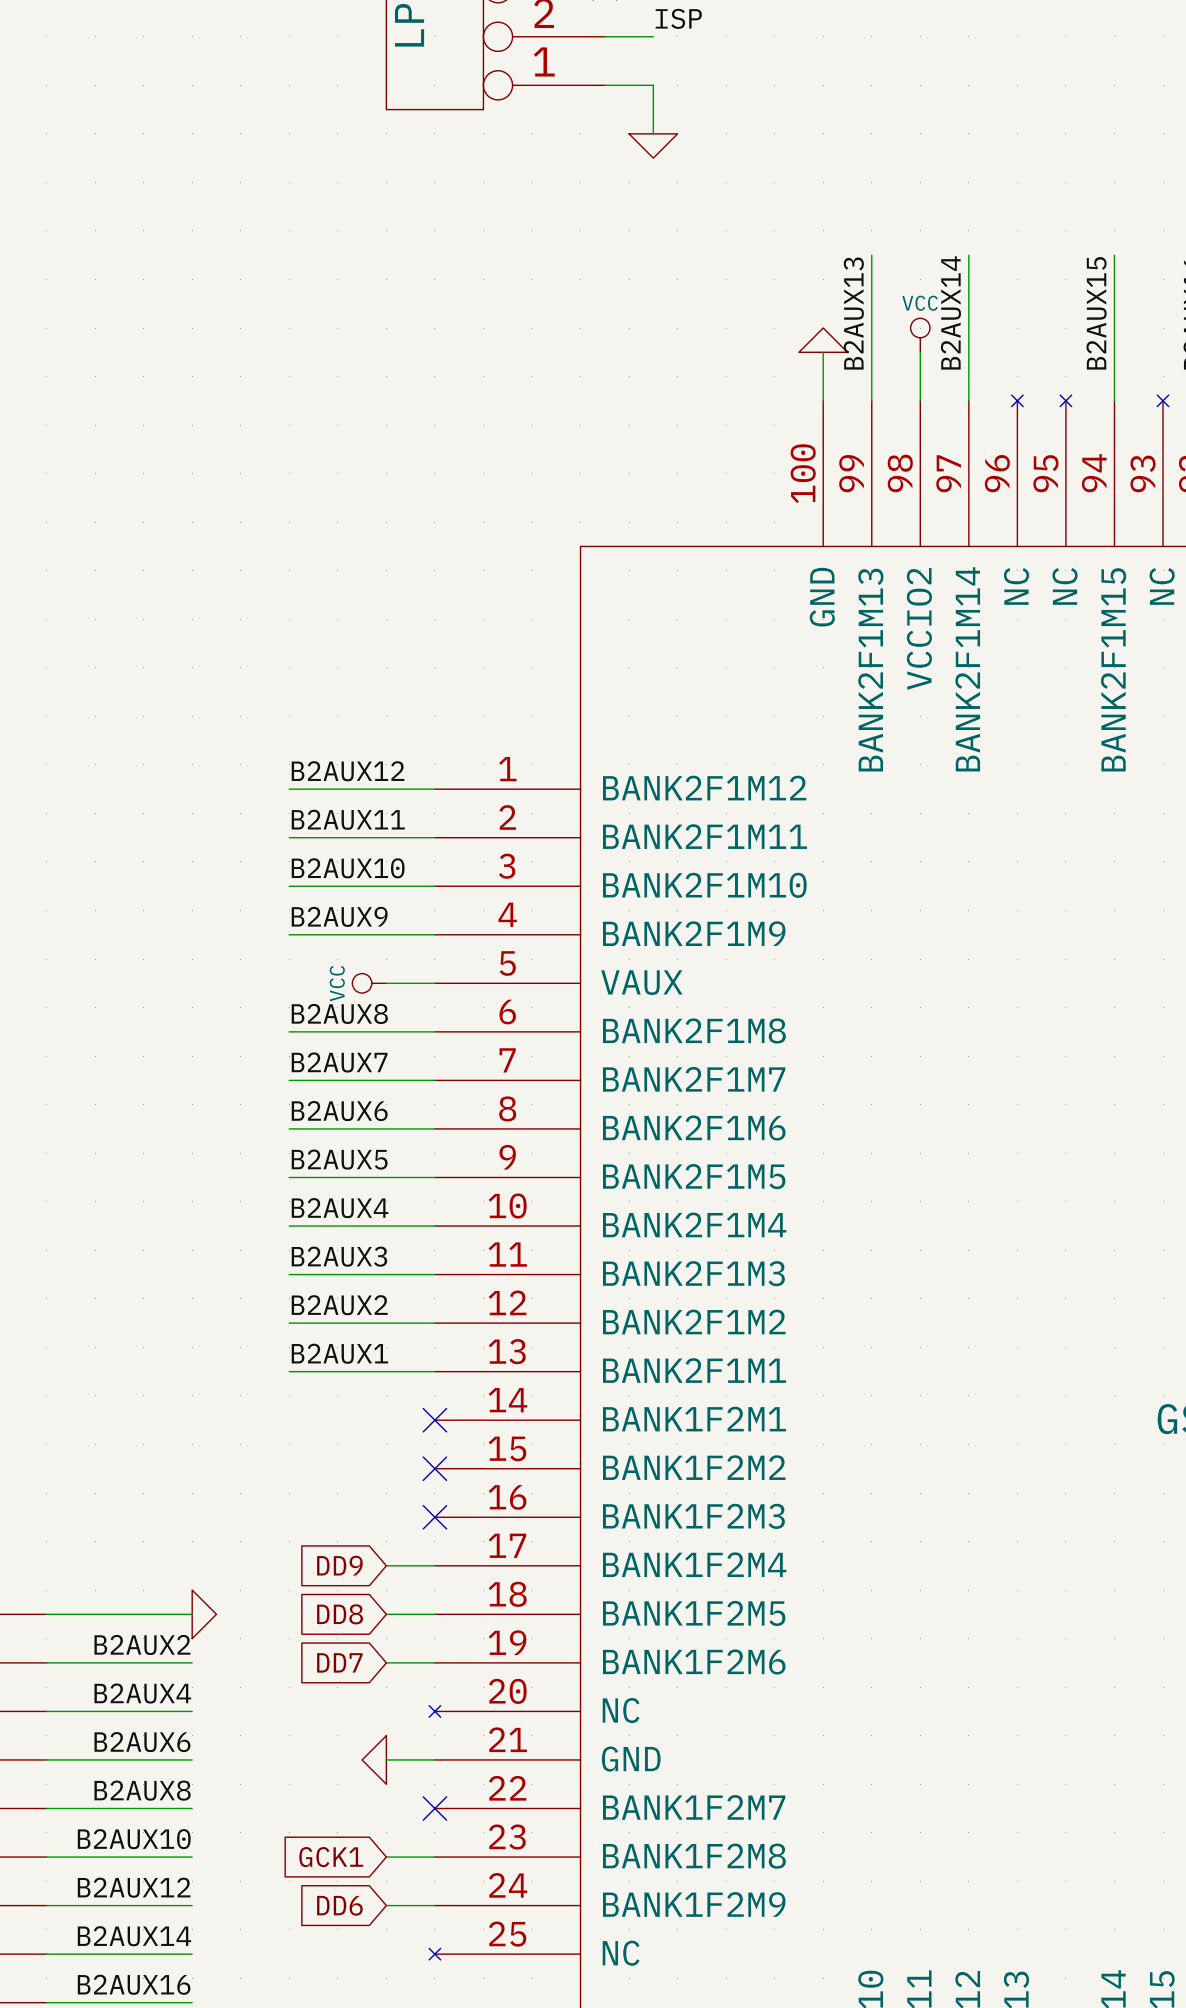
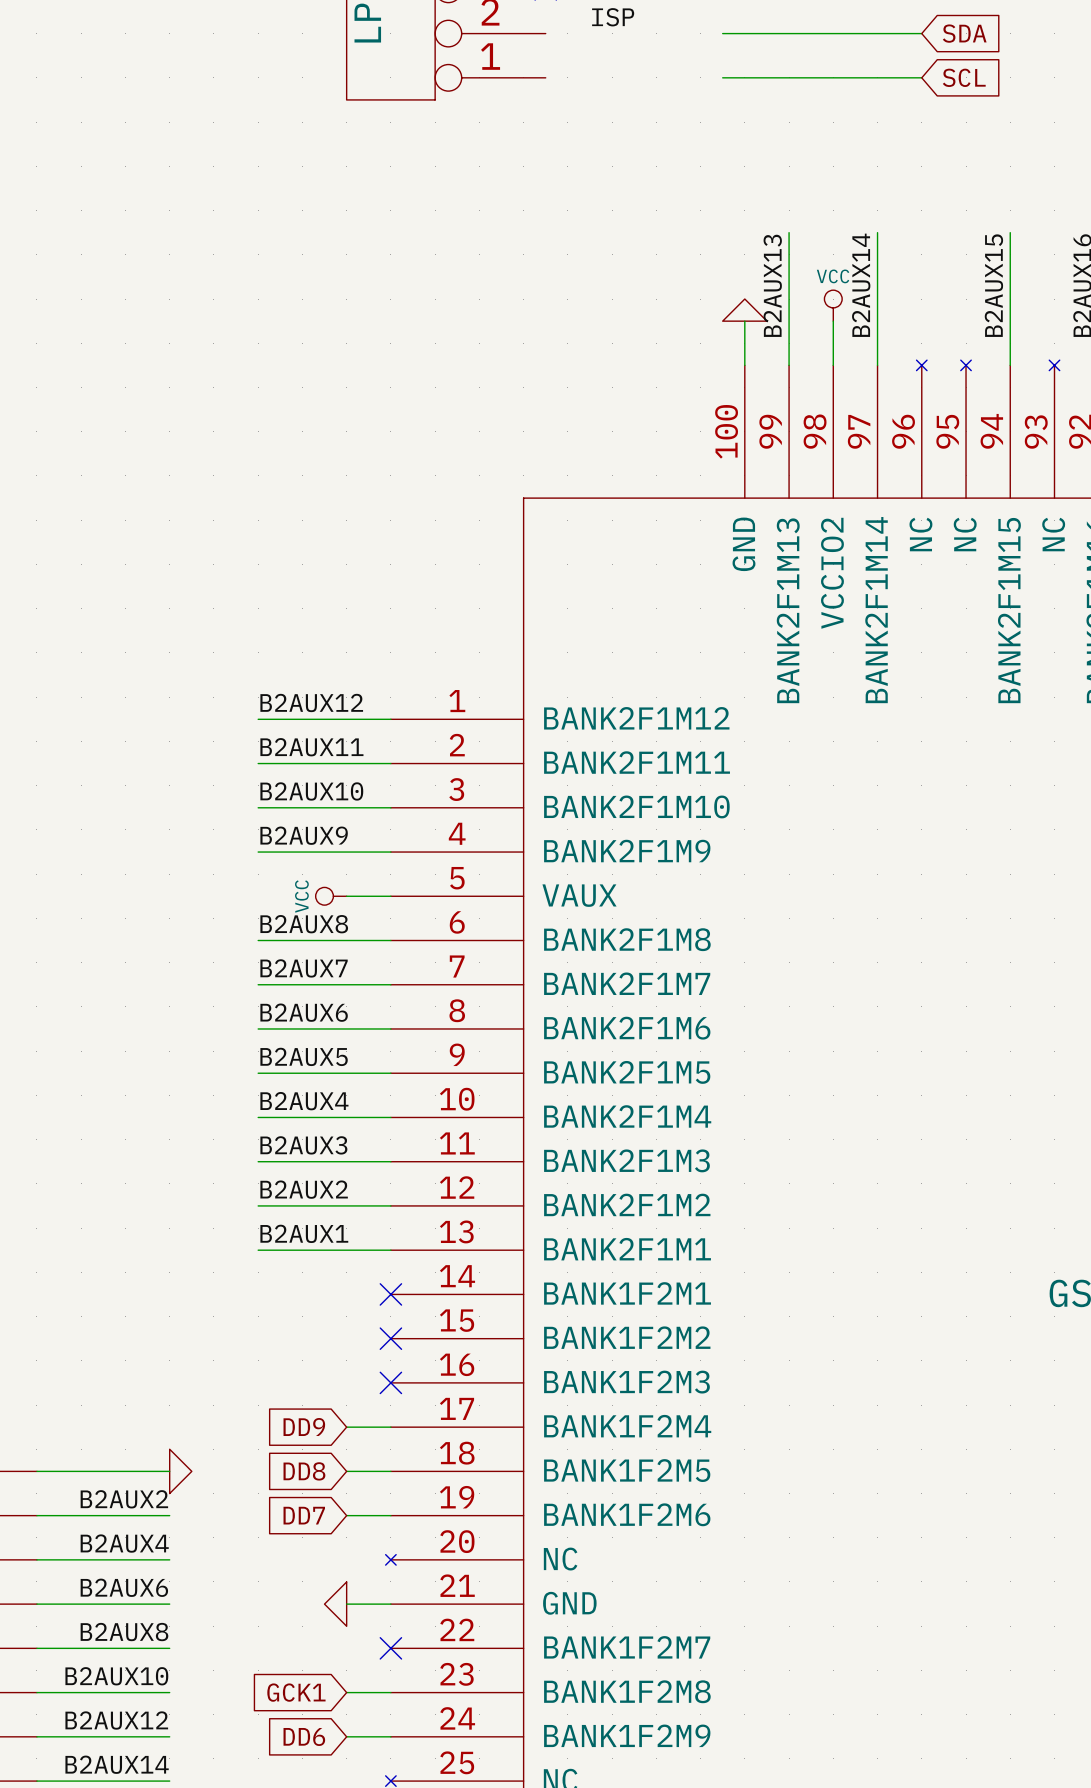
wire: (604, 36) (653, 36) -> none
wire: none -> (722, 33) (921, 33)
global label: none -> SDA (964, 33)
wire: (604, 85) (653, 85) (653, 133) -> none
wire: none -> (722, 77) (921, 77)
global label: none -> SCL (964, 77)
power symbol: (653, 145) -> none

